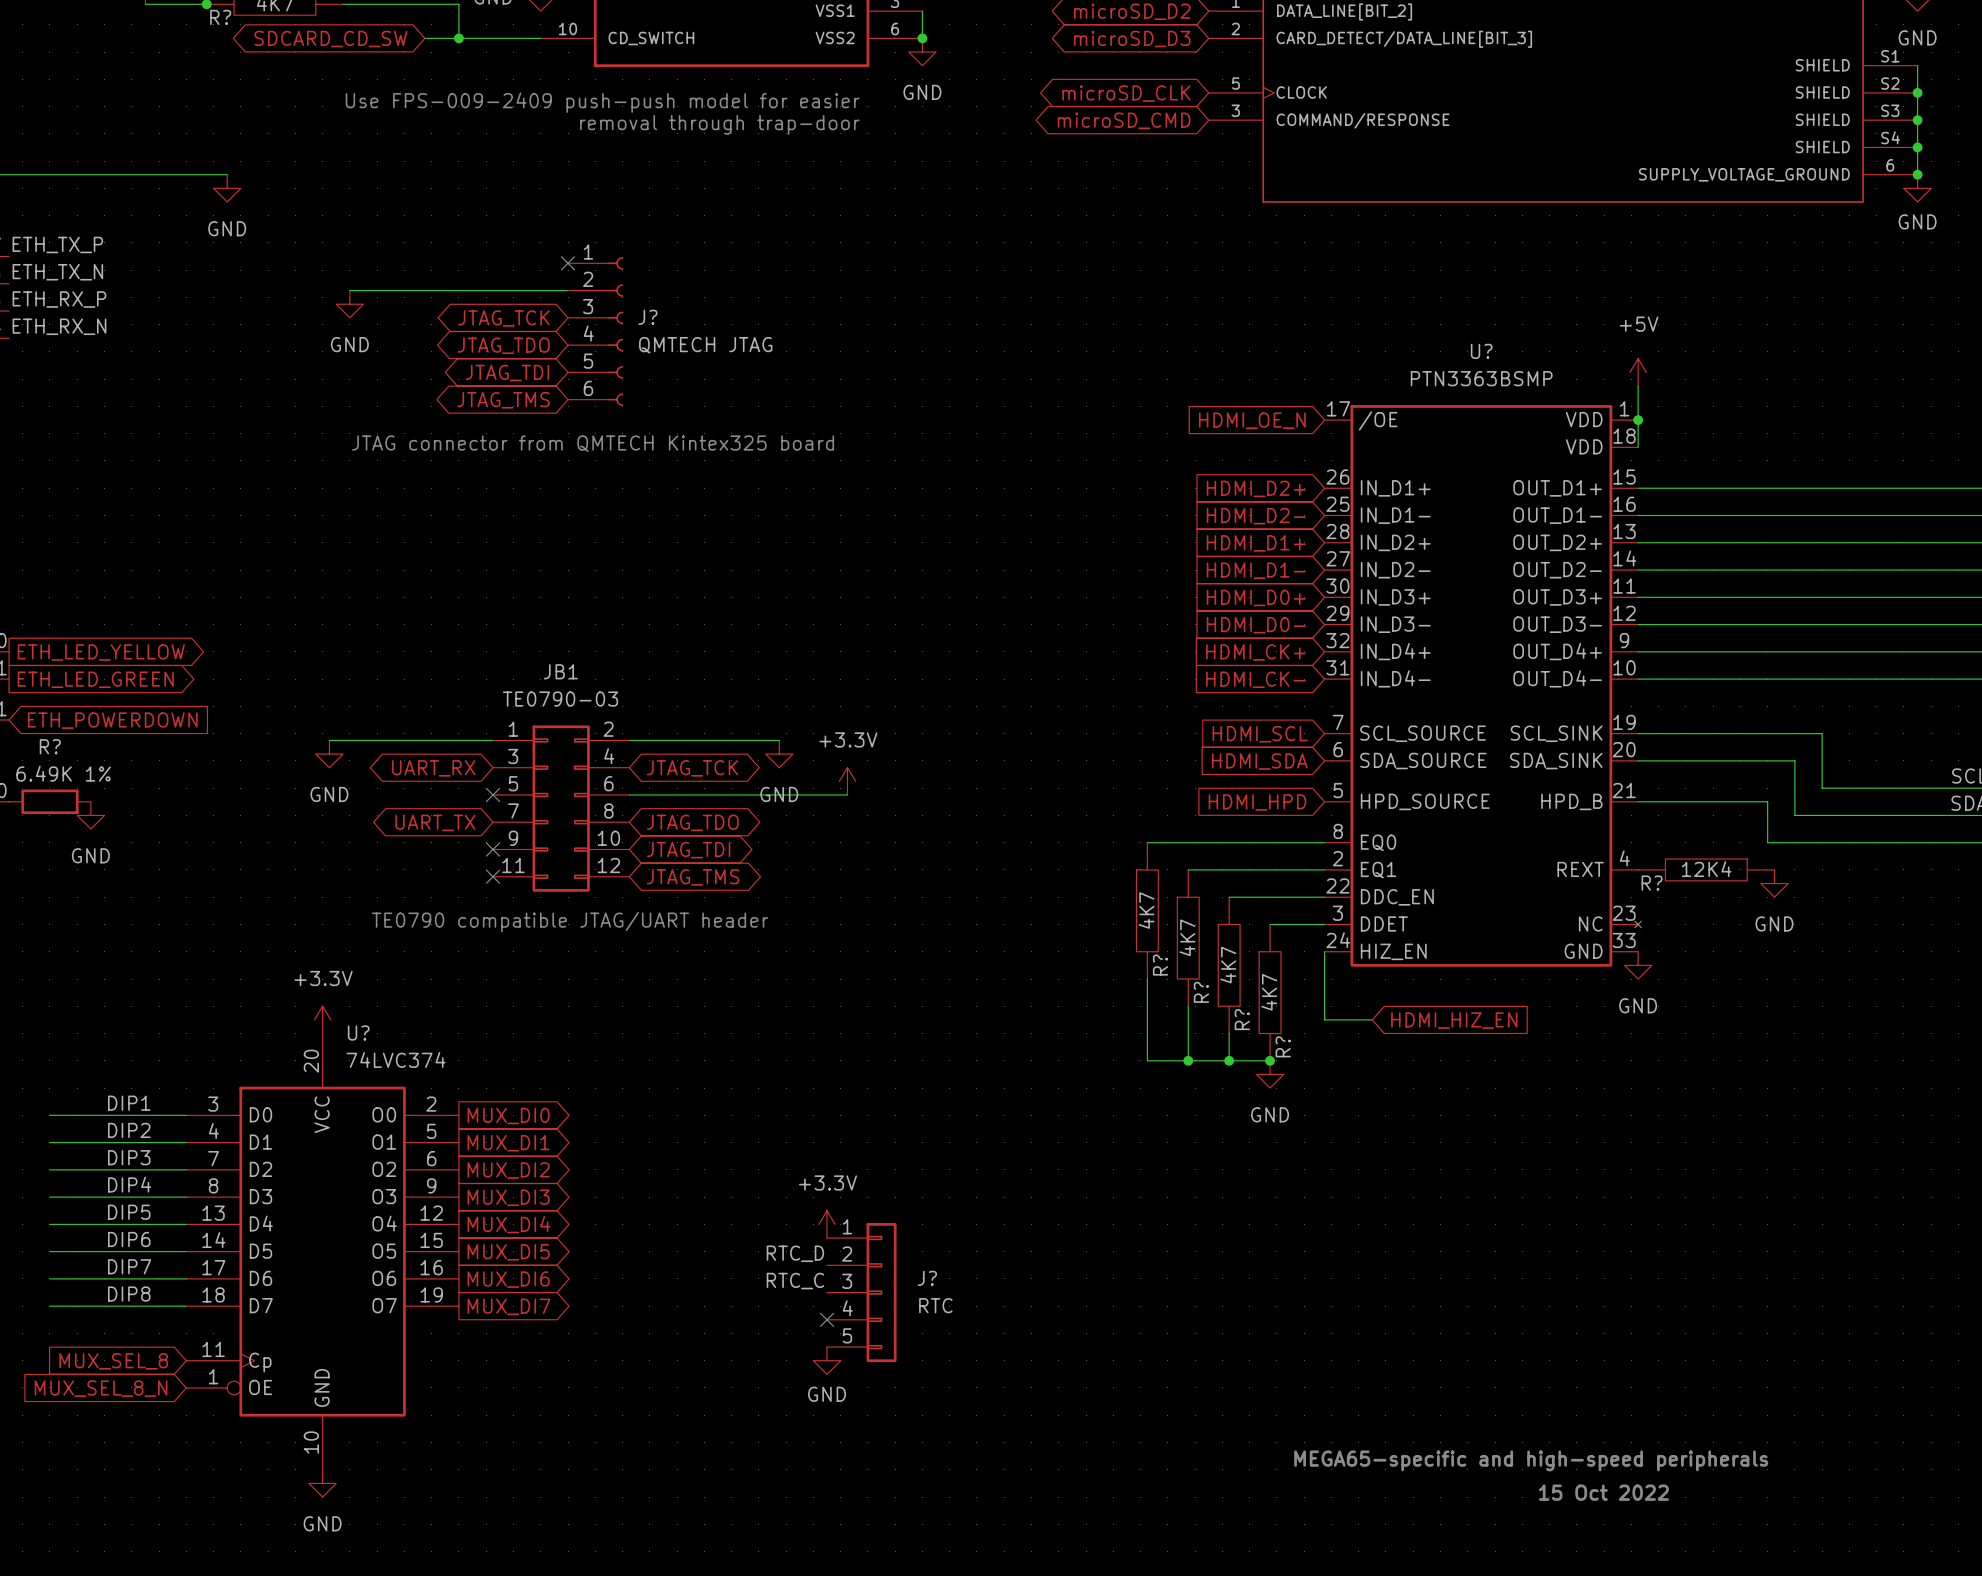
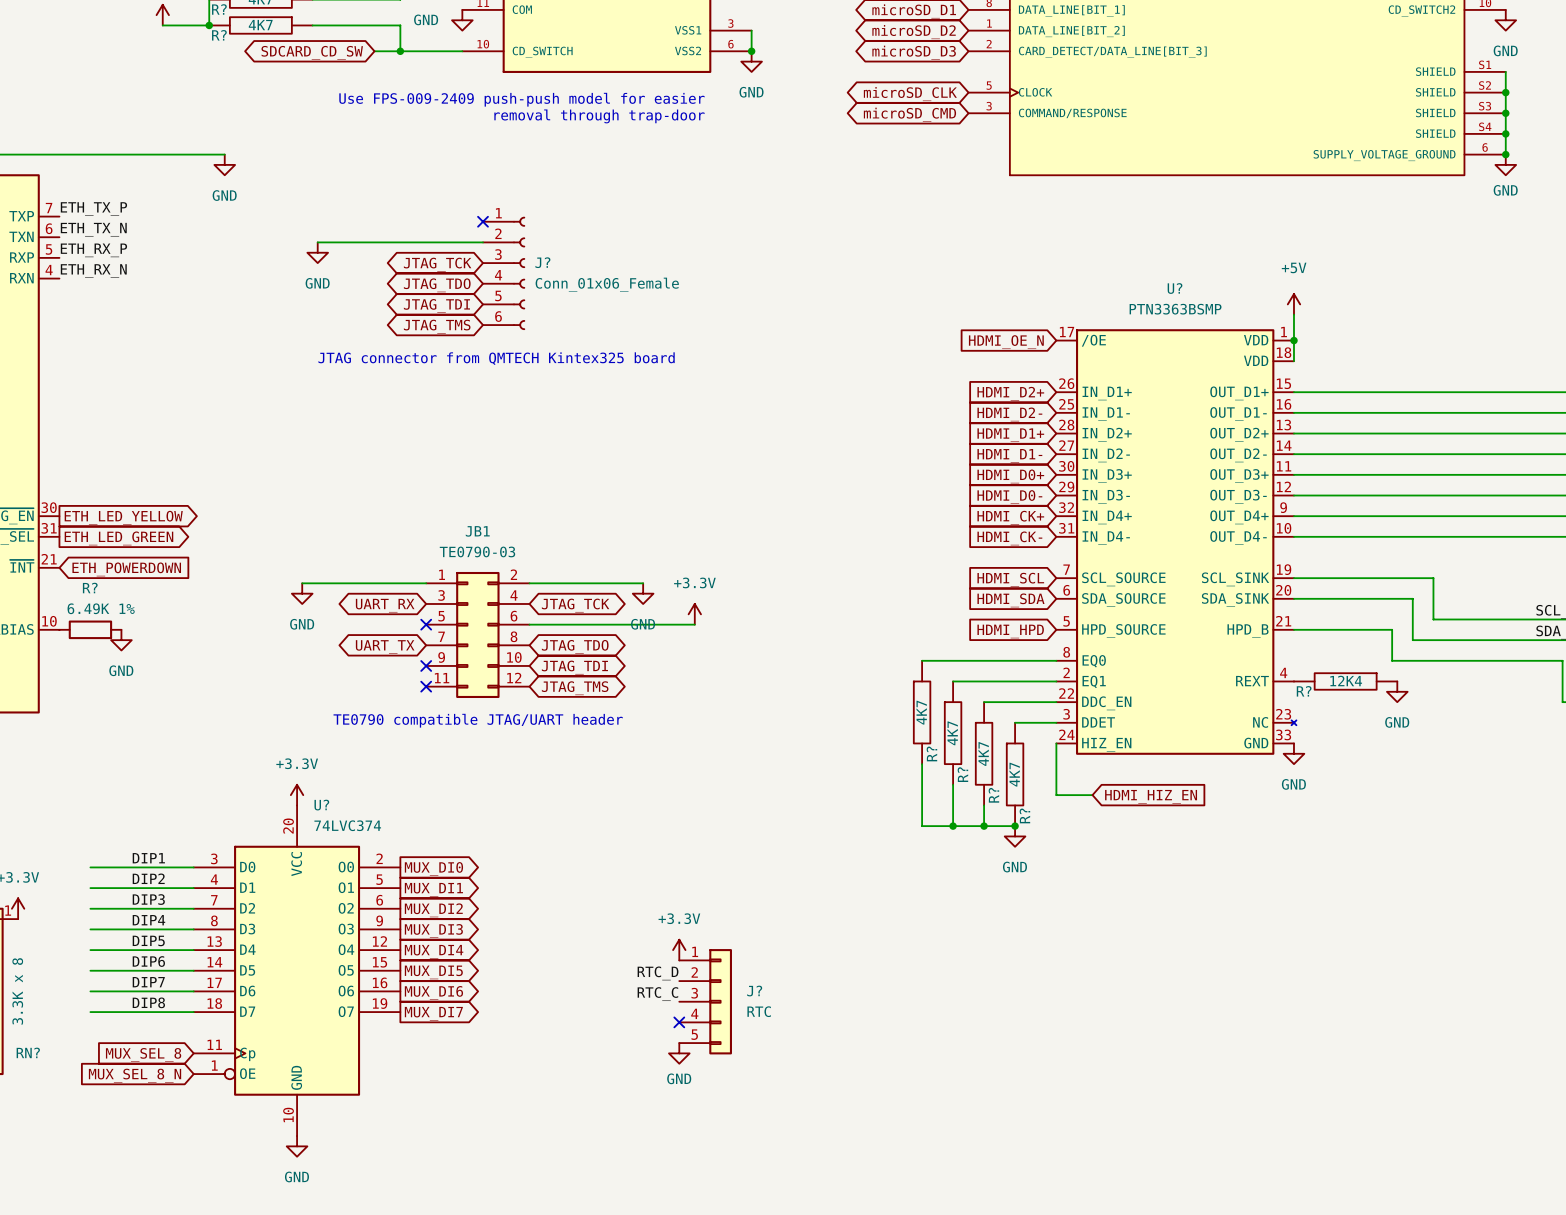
J? value: QMTECH JTAG (705, 345) -> Conn_01x06_Female (607, 284)
text: MEGA65-specific and high-speed peripherals (1531, 1460) -> none
text: 15 Oct 2022 (1603, 1492) -> none

